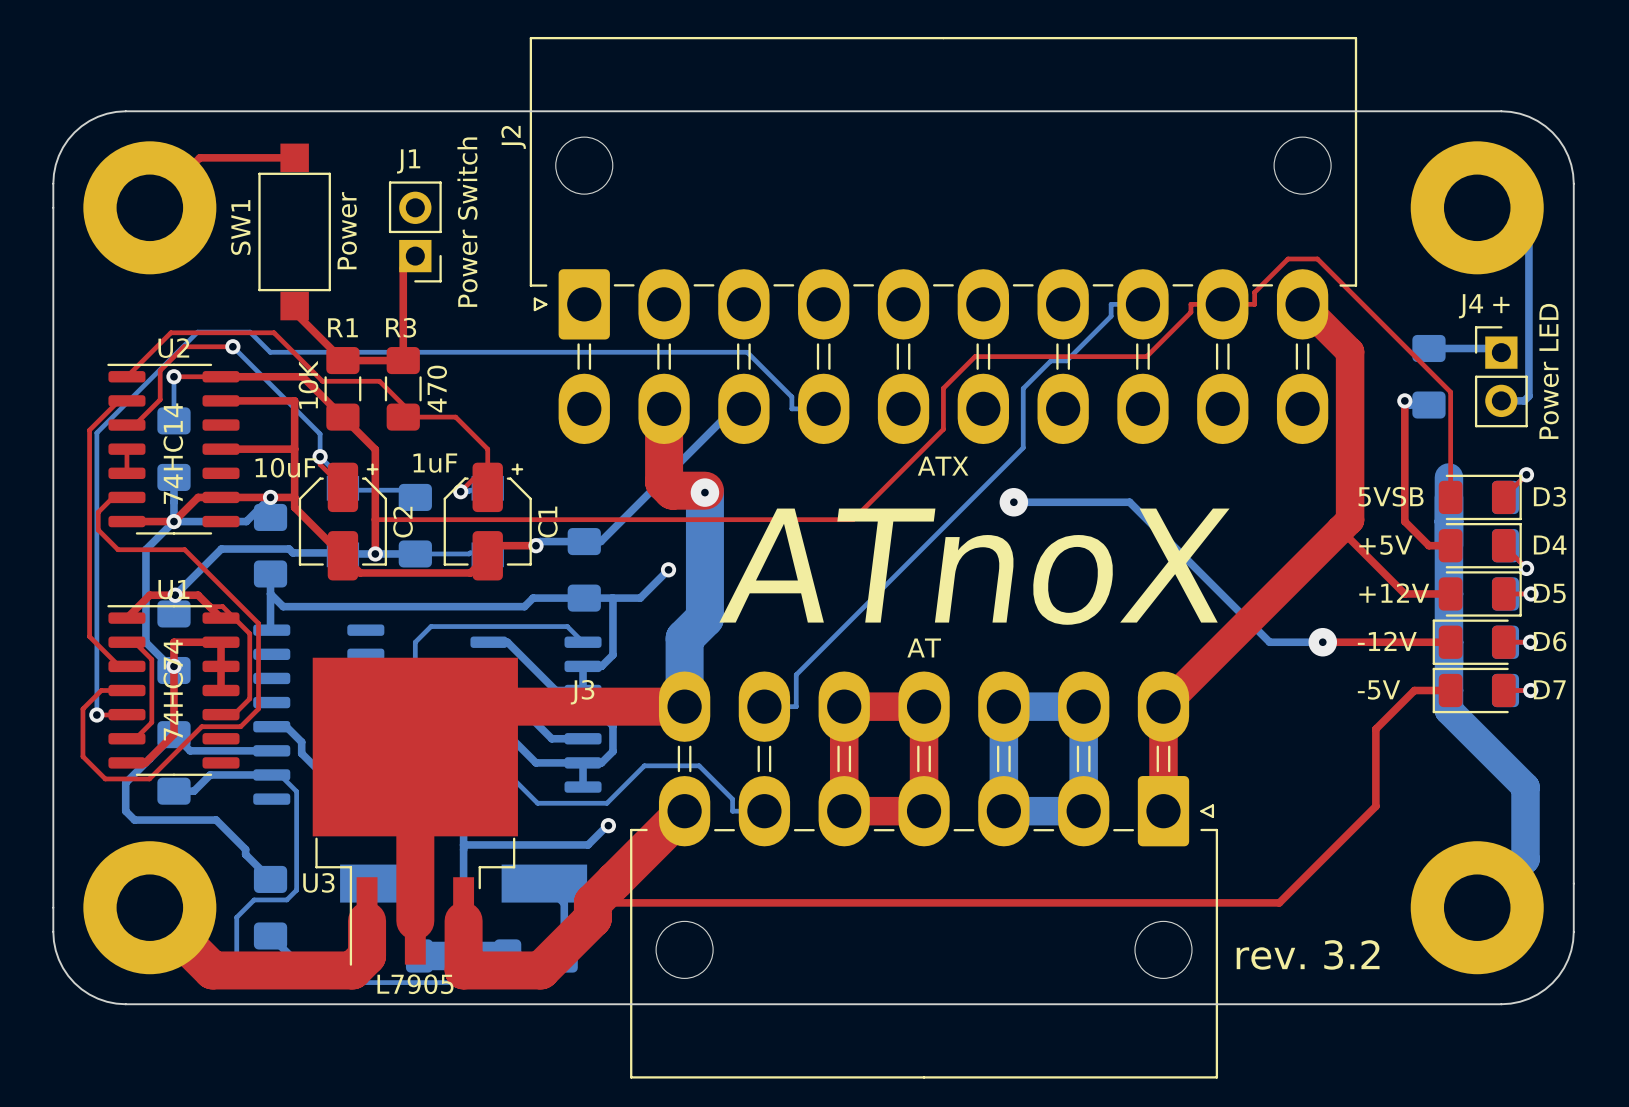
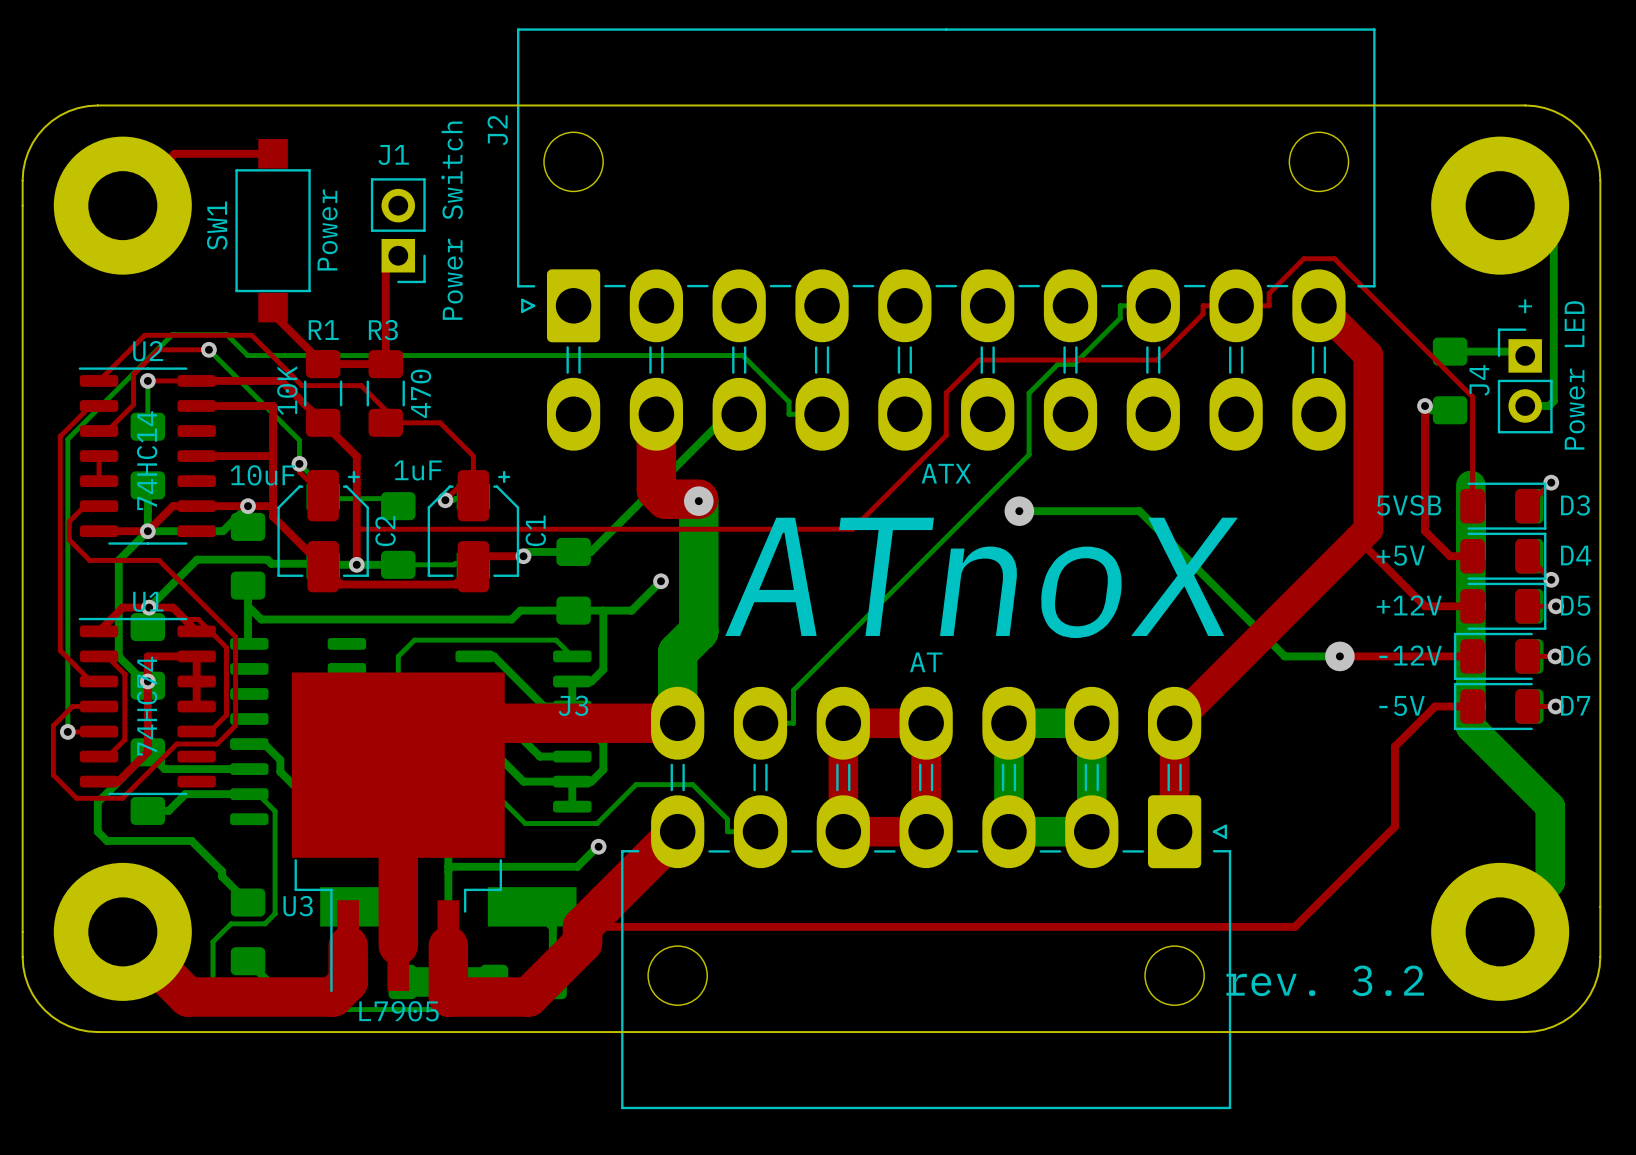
J4 name rotation: 0° (1471, 306) -> 90° counterclockwise (1479, 380)
J4 name position: J4 (1471, 306) -> J4 (1479, 380)

